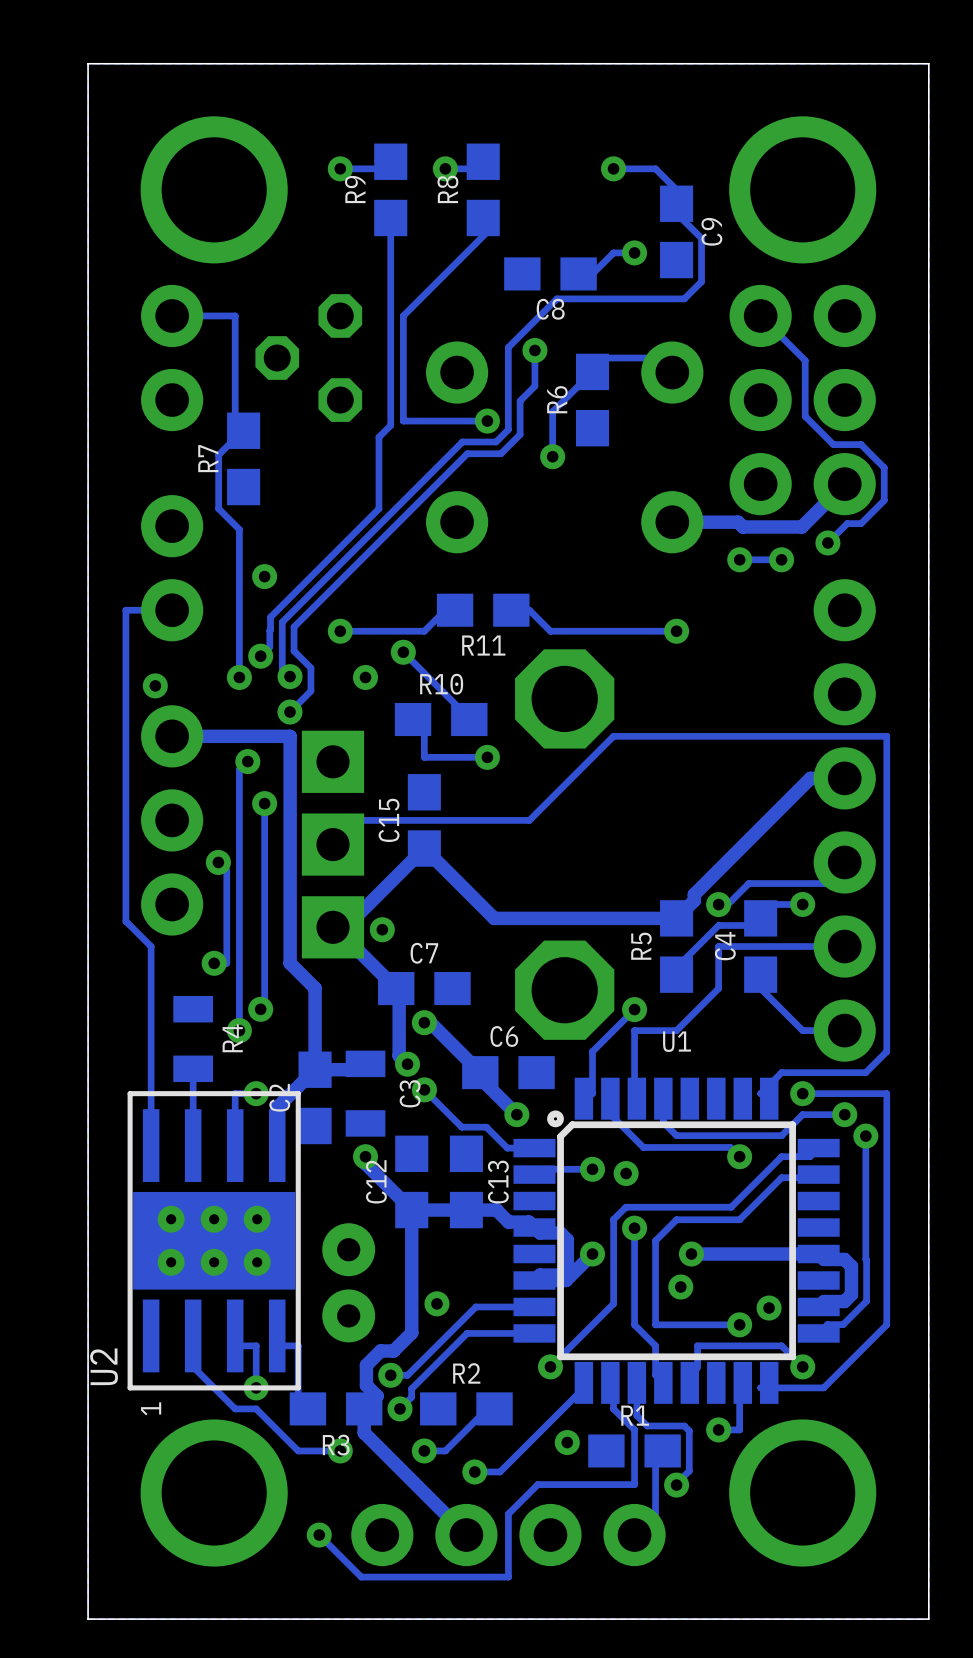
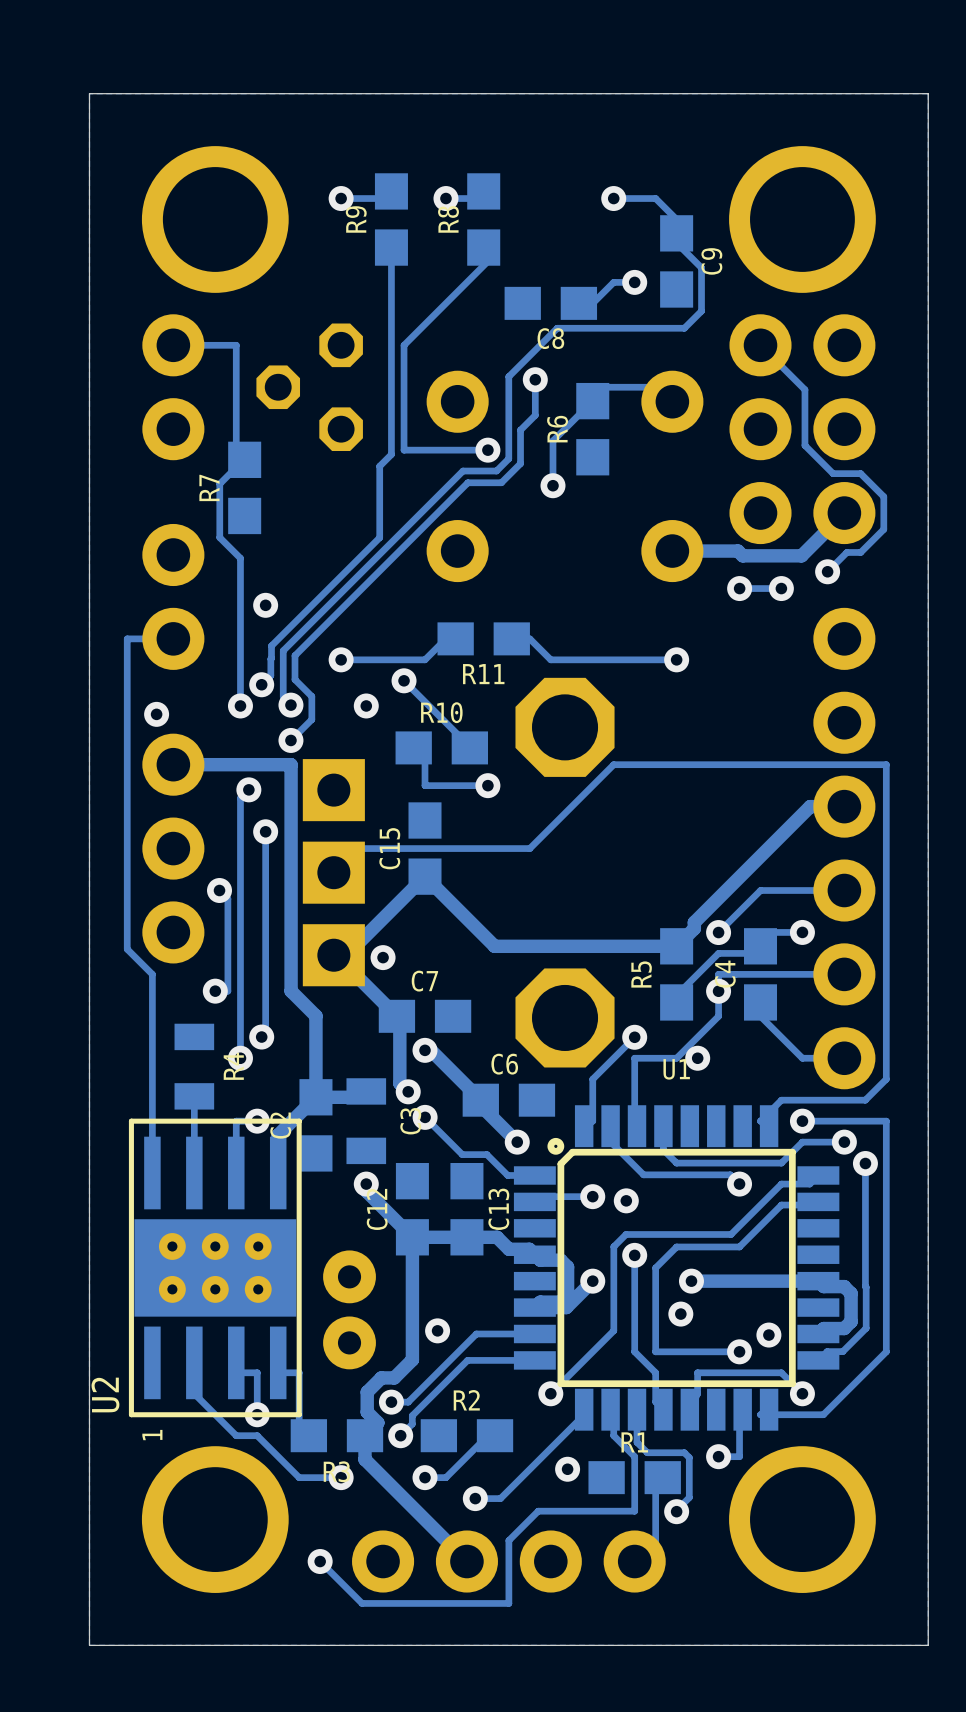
track: (844, 862) (823, 883) (748, 883) (727, 904) (718, 904) -> (844, 890) (760, 890) (718, 932)
via: none -> (718, 991)
via: none -> (697, 1058)

